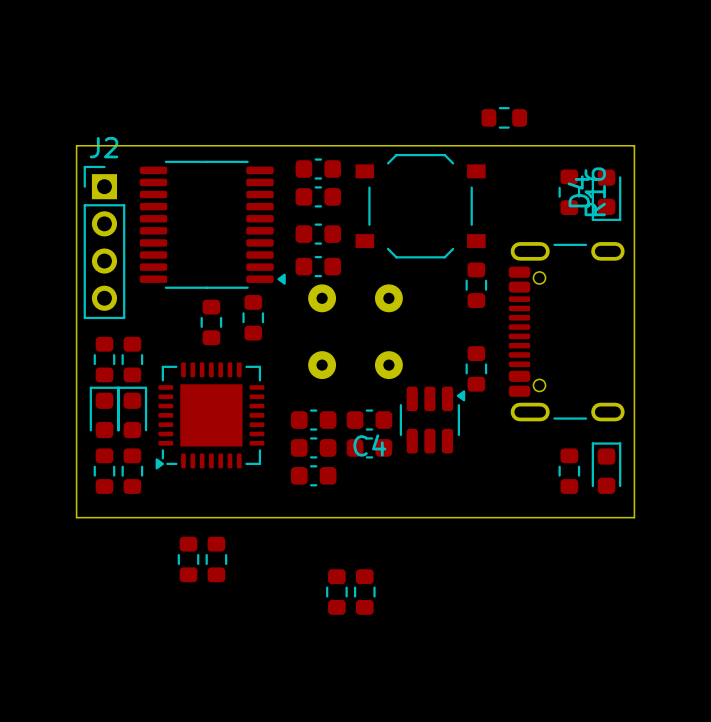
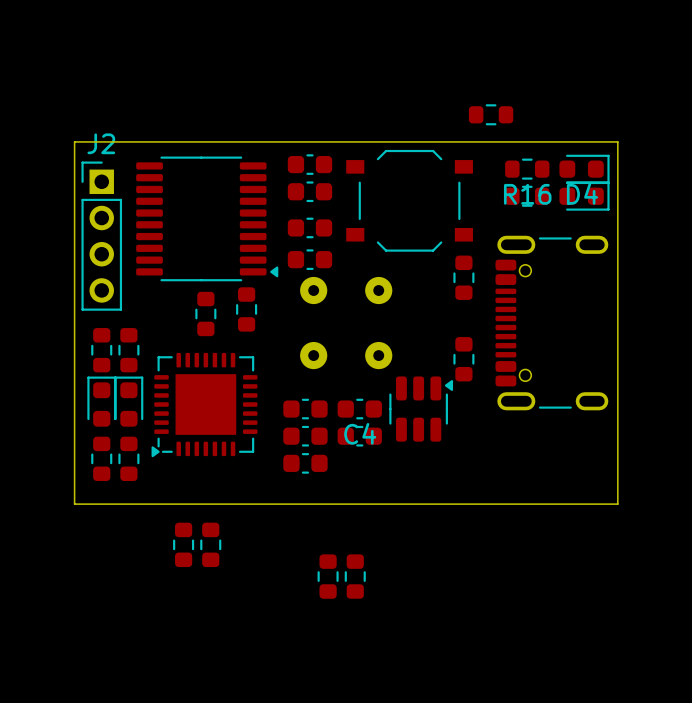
R16 rotation: 0° (569, 192) -> 90° clockwise (527, 169)
R16 position: (569, 192) -> (527, 169)
D4 rotation: 0° (606, 195) -> 90° counterclockwise (584, 169)
part rotation: 0° (606, 468) -> 90° clockwise (584, 196)
part position: (606, 468) -> (584, 196)
part rotation: 0° (569, 471) -> 90° clockwise (527, 196)
part position: (569, 471) -> (527, 196)

